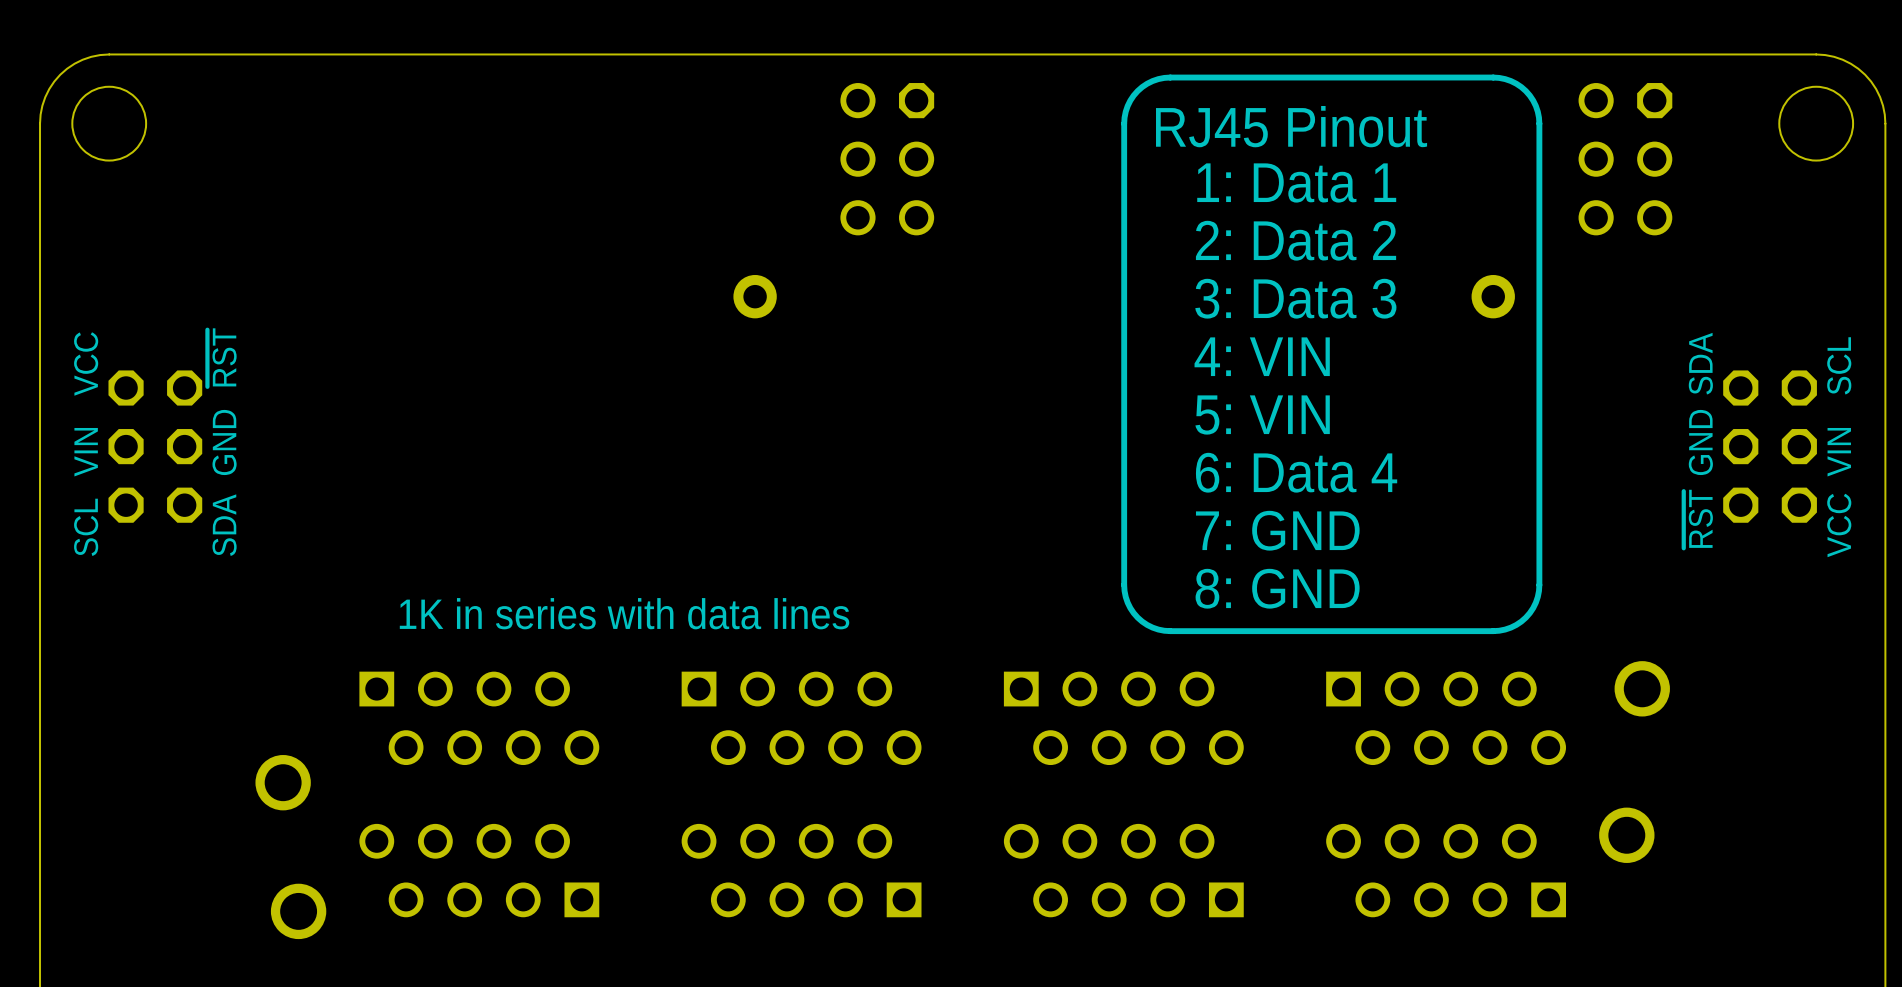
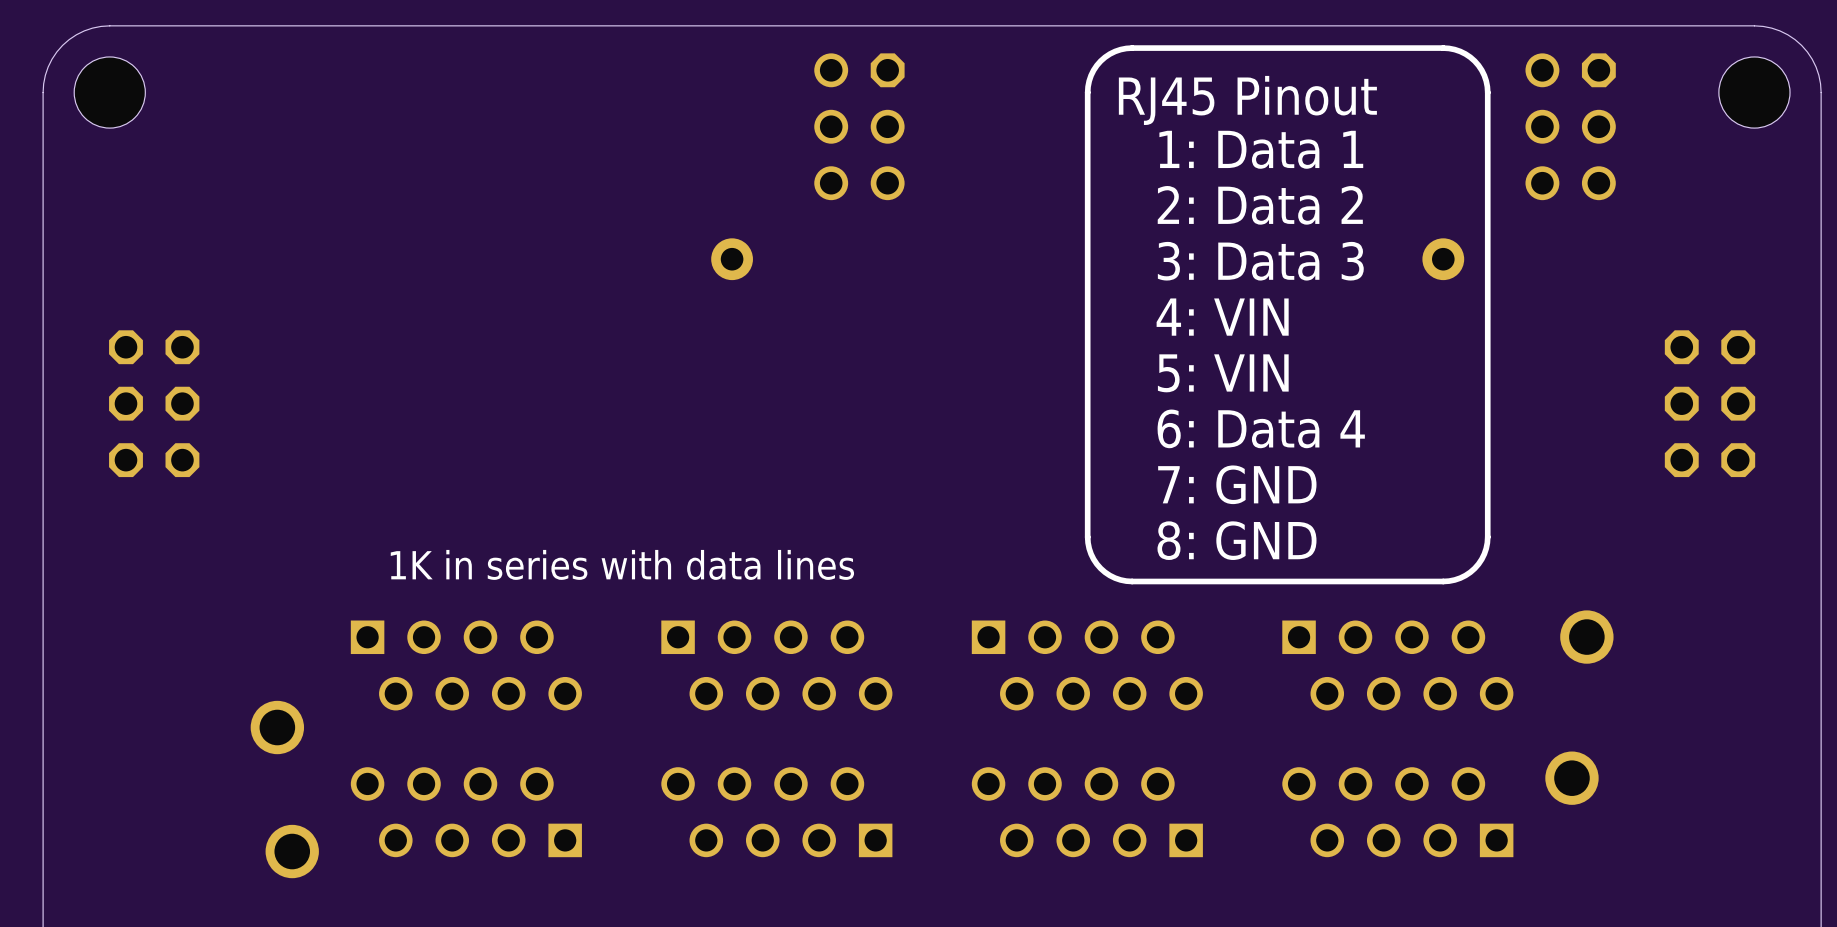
text: ~{RST} (222, 357) -> none
text: SDA (1700, 363) -> none
text: VCC (86, 364) -> none
text: SCL (1839, 365) -> none
text: GND (224, 442) -> none
text: GND (1700, 442) -> none
text: VIN (86, 452) -> none
text: VIN (1839, 452) -> none
text: ~{RST} (1698, 519) -> none
text: SDA (224, 525) -> none
text: VCC (1839, 525) -> none
text: SCL (86, 527) -> none

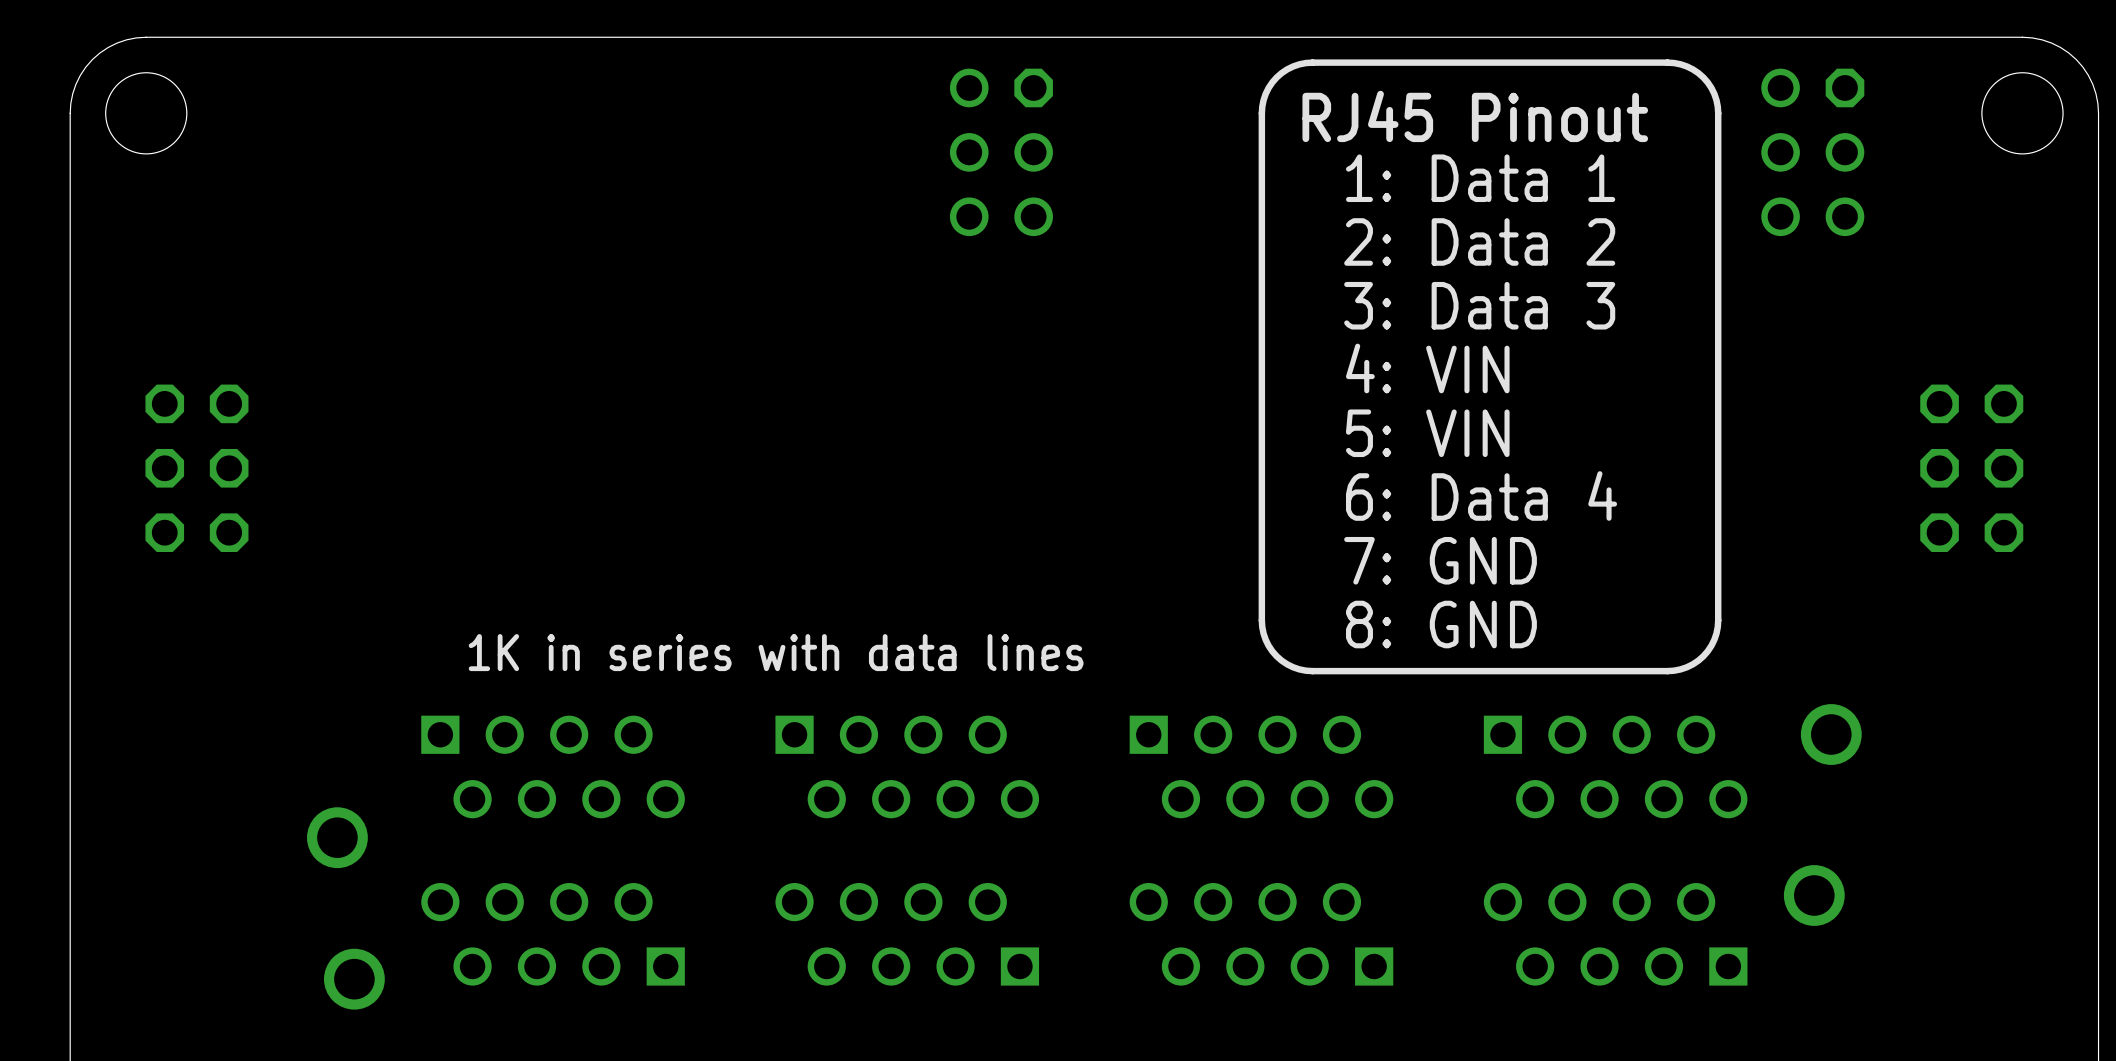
part: (732, 259) -> none
part: (1443, 259) -> none

